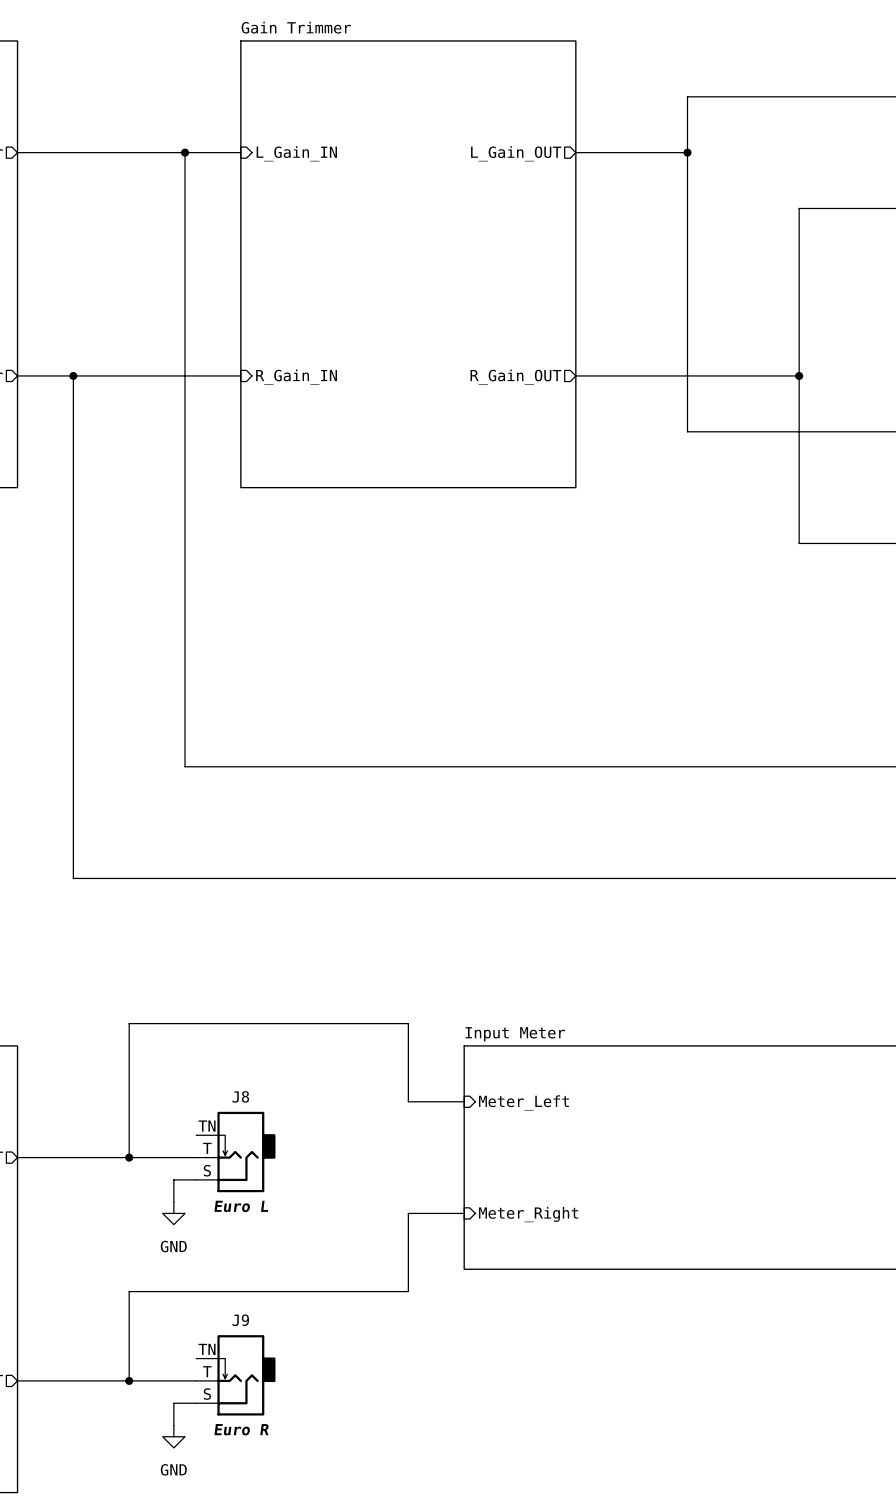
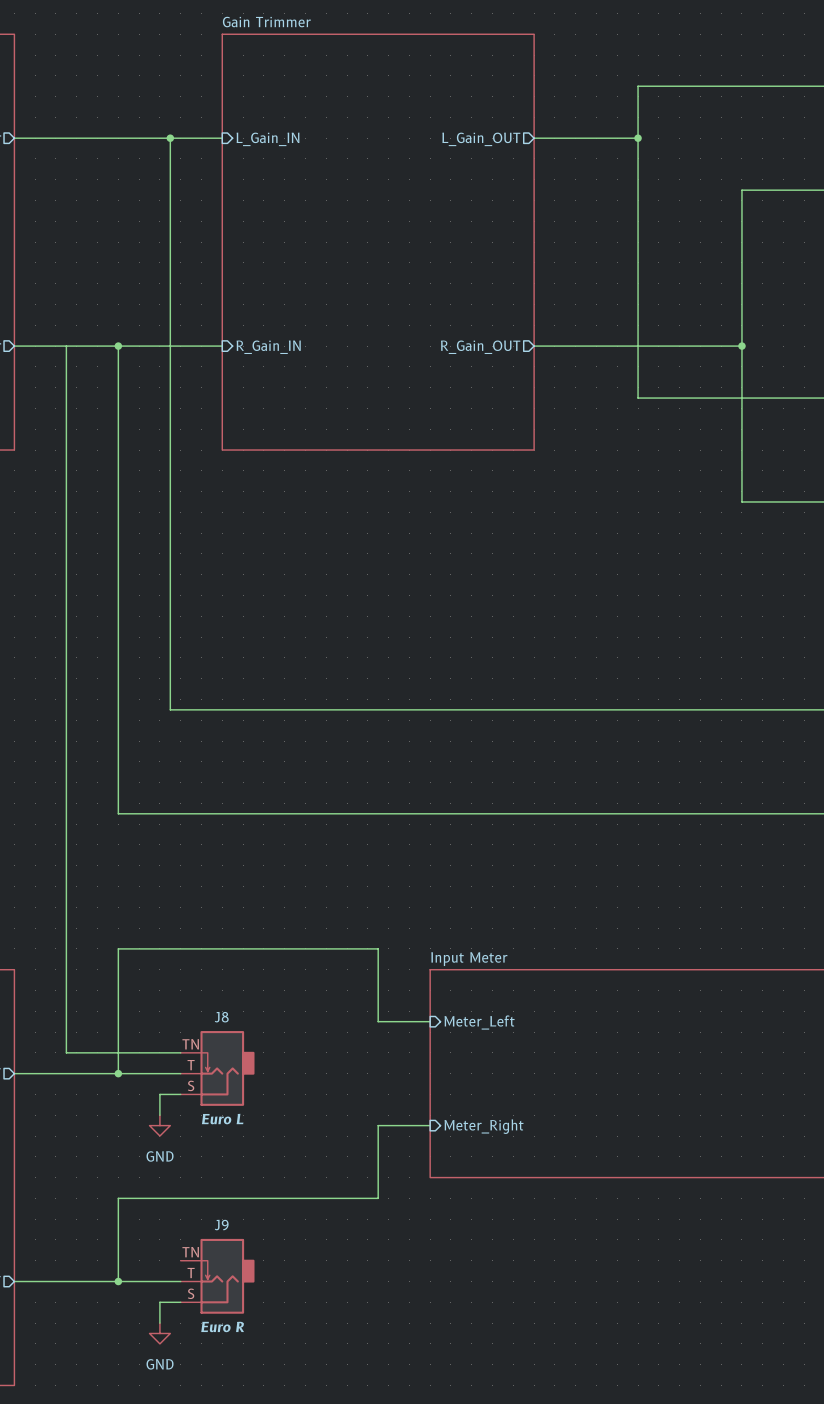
junction: (73, 375) -> none
wire: none -> (118, 346) (118, 813)
junction: none -> (118, 346)
wire: (73, 878) (129, 878) -> (66, 813) (66, 1052) (180, 1052)

